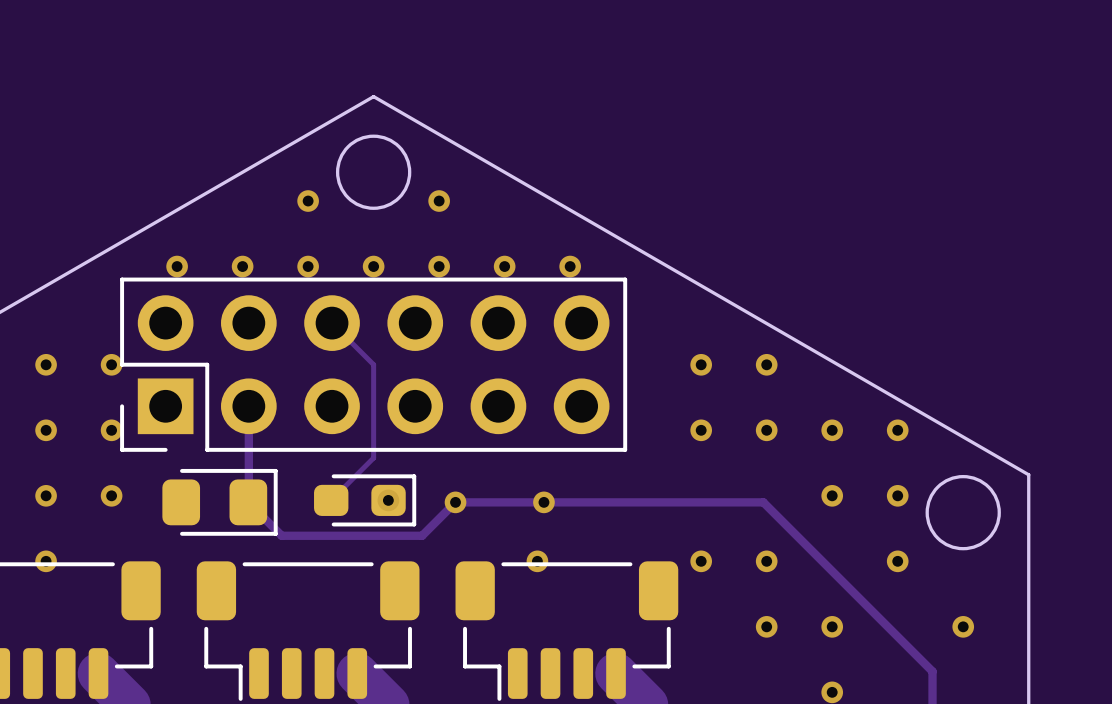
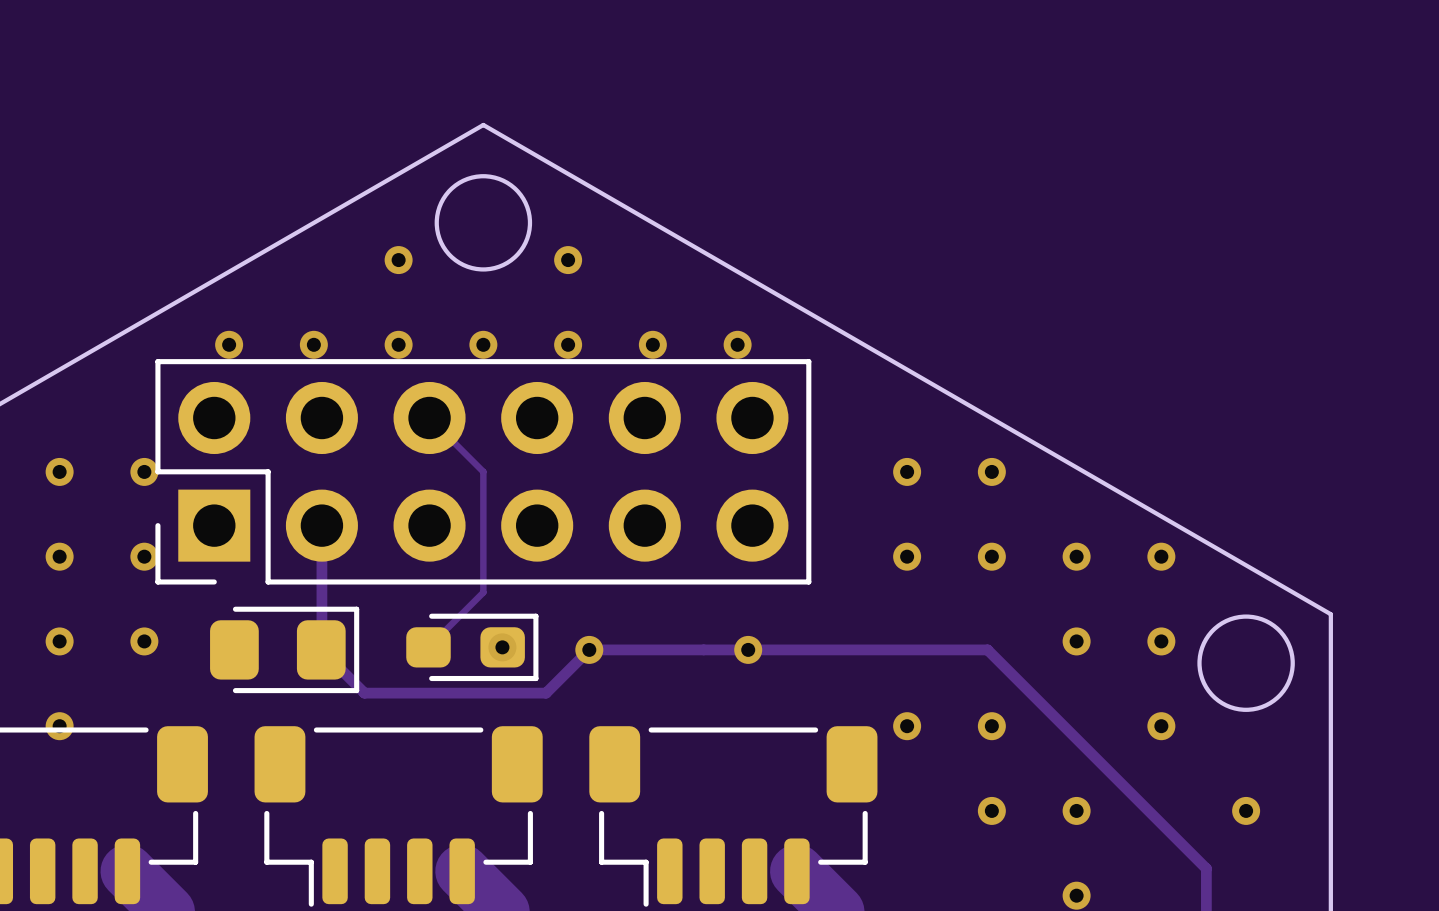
via position: (543, 502) -> (748, 649)
via: (537, 561) -> none

